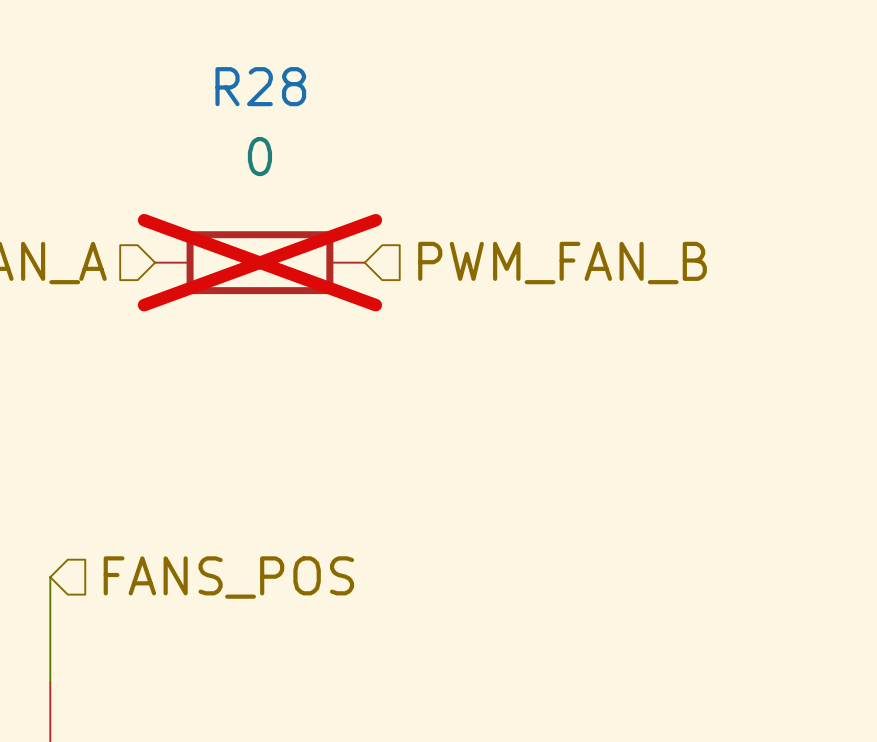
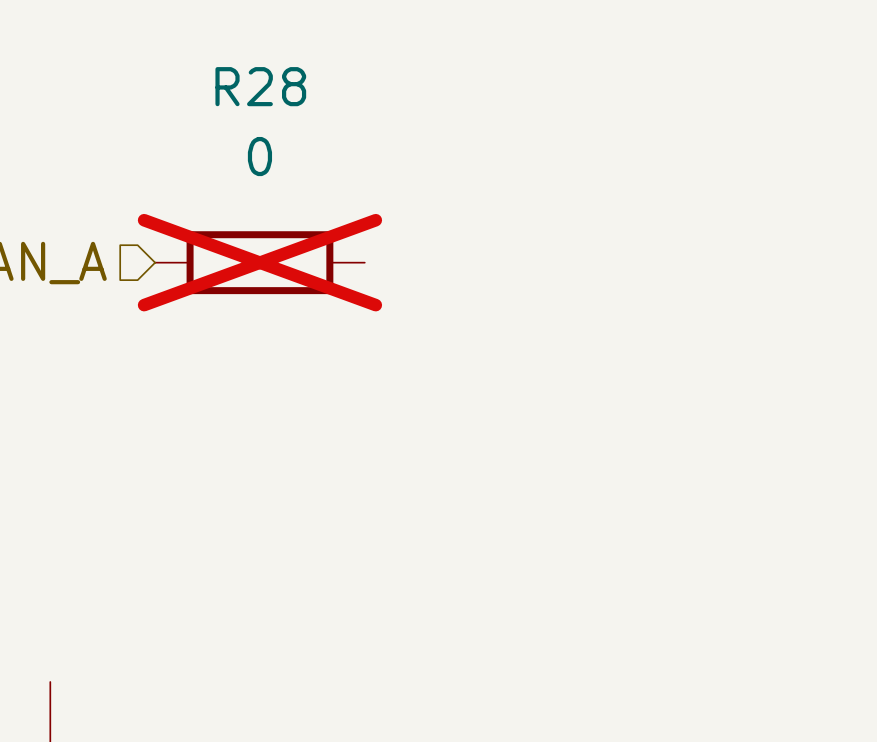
hierarchical label: PWM_FAN_B (562, 263) -> none
wire: (50, 577) (50, 681) -> none
hierarchical label: FANS_POS (228, 577) -> none

